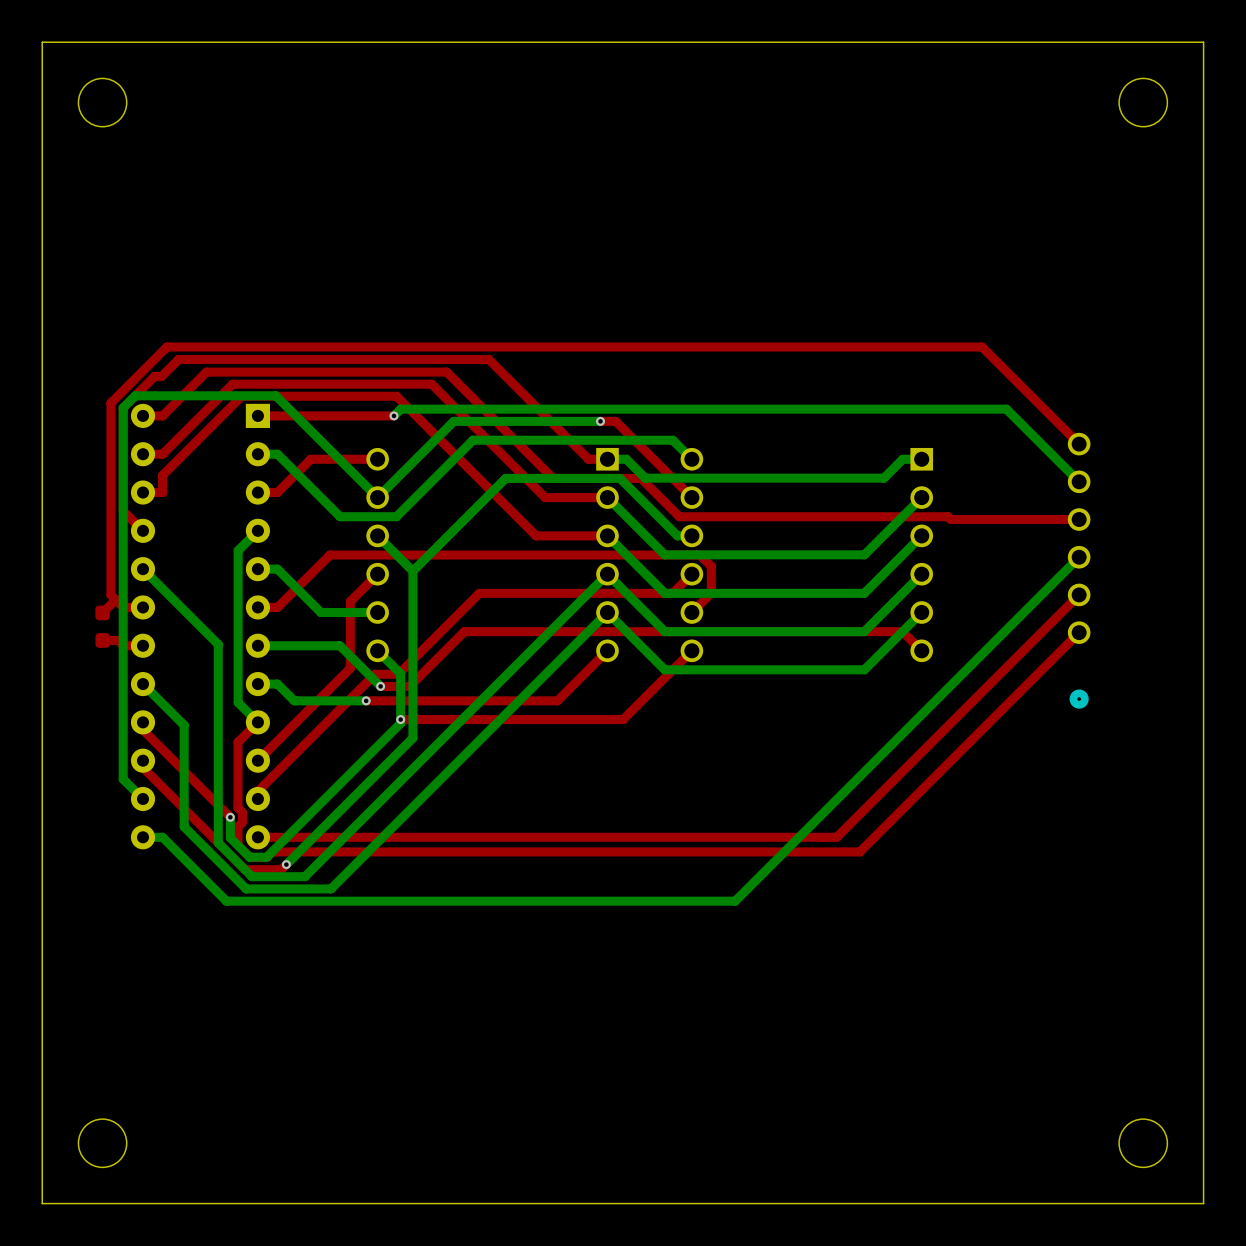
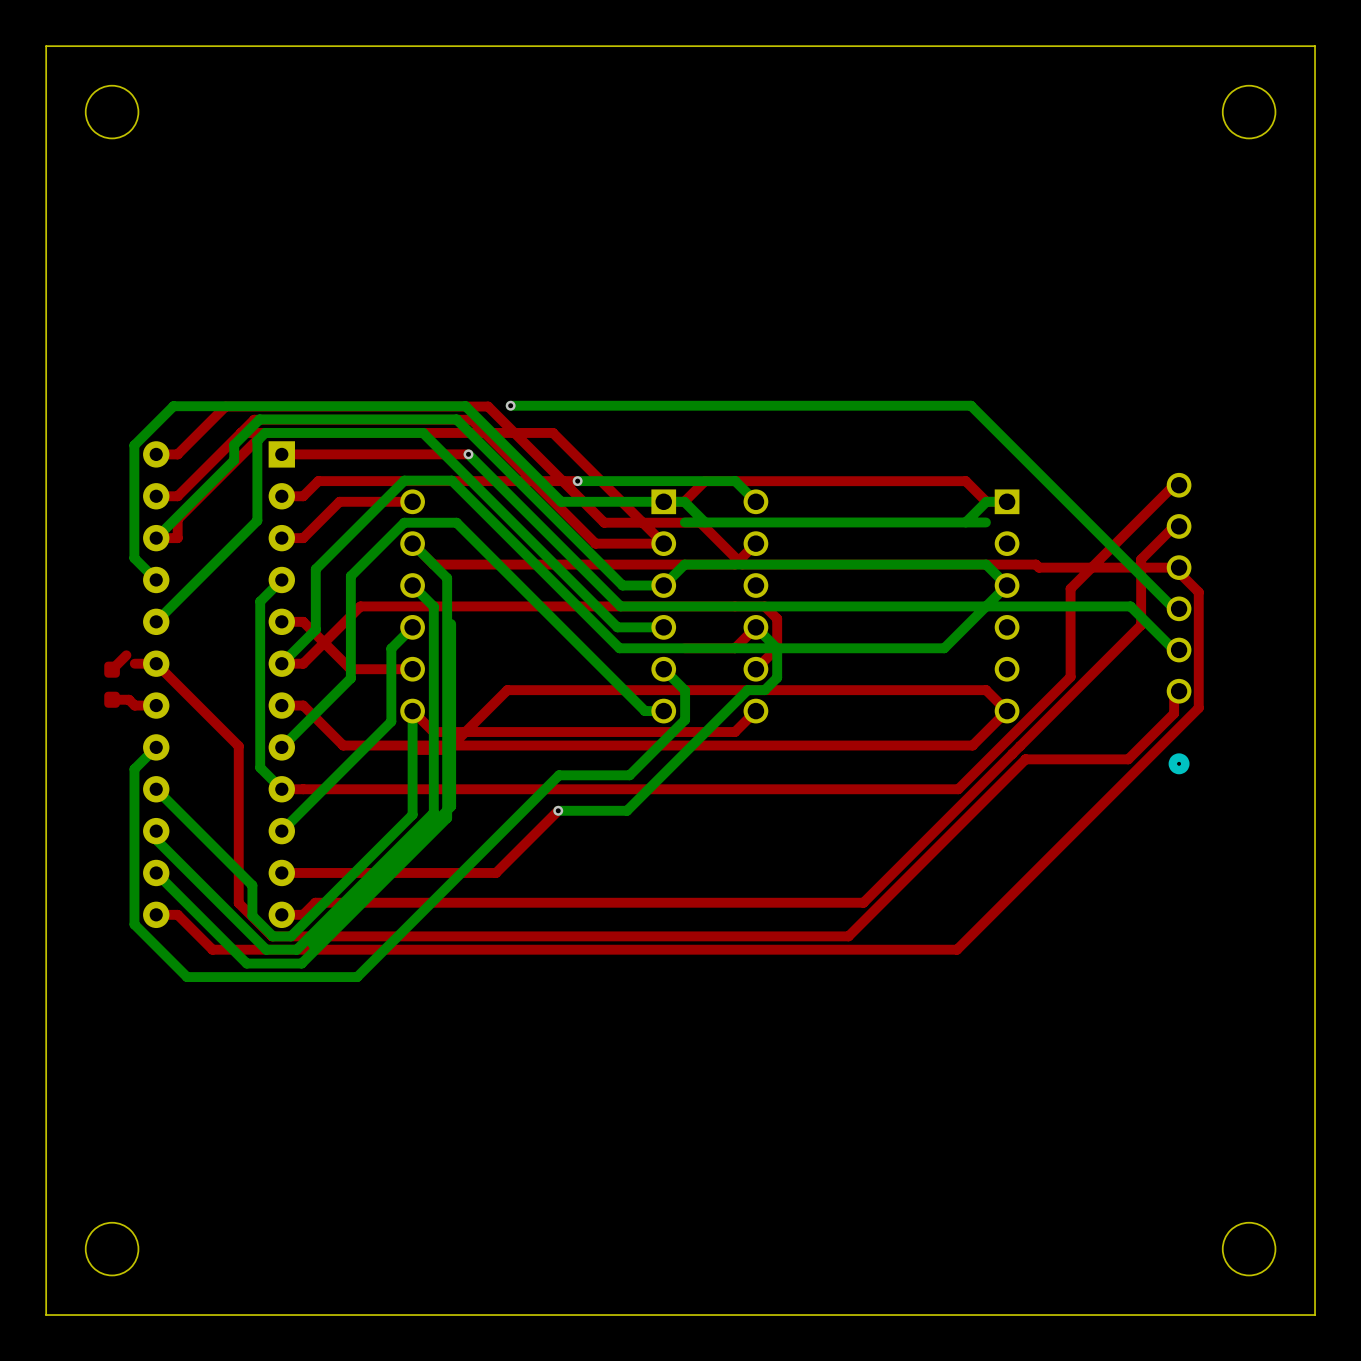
bottom track: none -> (510, 405) (971, 405) (1174, 608)
via: none -> (510, 405)
top track: (396, 396) (536, 535) (607, 535) -> (433, 432) (553, 432) (663, 543)
top track: (393, 415) (257, 415) -> (468, 454) (281, 454)
bottom track: (393, 415) (400, 409) (1006, 409) (1079, 481) -> none
via position: (393, 415) -> (468, 454)
bottom track: none -> (468, 454) (620, 606) (1130, 606) (1174, 650)
top track: (600, 421) (615, 421) (691, 497) -> (412, 543) (433, 564) (735, 564) (755, 543)
bottom track: (600, 421) (453, 421) (377, 497) (275, 395) (135, 395) (123, 407) (123, 779) (142, 798) -> (412, 543) (447, 578) (447, 818) (301, 963) (246, 963) (156, 872)
via: (600, 421) -> none
top track: none -> (577, 481) (318, 481) (303, 496) (281, 496)
bottom track: (528, 440) (473, 440) (396, 516) (340, 516) (277, 454) (257, 454) -> none
via: none -> (577, 481)
top track: (1079, 444) (982, 347) (166, 347) (110, 403) (110, 595) (123, 607) -> none
top track: (607, 459) (588, 459) (488, 359) (178, 359) (161, 376) (154, 376) (123, 407) (123, 511) (142, 530) -> (663, 501) (684, 501) (704, 481) (965, 481) (986, 501) (1007, 501)
bottom track: none -> (663, 501) (561, 501) (465, 406) (173, 406) (134, 445) (134, 558) (156, 579)
bottom track: none -> (156, 538) (234, 460) (234, 444) (259, 419) (456, 419) (622, 585) (663, 585) (684, 564) (986, 564) (1007, 585)
bottom track: (921, 497) (864, 554) (664, 554) (607, 497) -> none
top track: none -> (1174, 567) (1198, 592) (1198, 708) (957, 949) (212, 949) (177, 914) (156, 914)
bottom track: (607, 535) (664, 593) -> (281, 663) (315, 629) (315, 569) (404, 480) (451, 480) (619, 648) (726, 648)
bottom track: (691, 535) (677, 535) (620, 478) (505, 478) (412, 571) (397, 555) -> (156, 831) (156, 839) (266, 949) (296, 949) (433, 812) (433, 606)
bottom track: (1079, 557) (735, 901) (226, 901) (162, 837) (142, 837) -> none
bottom track: (142, 569) (218, 644) (218, 842) (252, 876) (304, 876) (607, 574) (664, 631) (684, 631) -> (156, 621) (257, 520) (257, 440) (265, 432) (423, 432) (617, 627) (663, 627)
top track: none -> (281, 621) (303, 621) (350, 669) (412, 669)
bottom track: (257, 569) (277, 569) (320, 612) (377, 612) -> none
top track: (377, 574) (350, 601) (350, 668) (257, 760) -> none
bottom track: none -> (412, 627) (391, 648) (391, 721) (281, 831)
bottom track: (921, 574) (864, 631) (700, 631) -> (755, 627) (777, 648) (777, 677) (764, 690)
top track: (626, 593) (479, 593) (398, 674) (374, 674) (257, 791) (257, 798) -> (558, 810) (496, 872) (281, 872)
top track: (1079, 594) (836, 837) (277, 837) -> (1174, 526) (1141, 559) (1141, 625) (863, 902) (315, 902) (303, 914)
top track: none -> (156, 663) (238, 746) (238, 903) (271, 936) (848, 936) (1025, 759) (1128, 759) (1174, 713) (1174, 691)
bottom track: (607, 612) (331, 888) (246, 888) (184, 826) (184, 725) (142, 684) -> (685, 690) (685, 719) (629, 775) (559, 775) (357, 977) (187, 977) (134, 924) (134, 769) (156, 747)
bottom track: (921, 612) (864, 669) (664, 669) (627, 632) -> none
bottom track: none -> (747, 690) (627, 810) (558, 810)
top track: (1079, 632) (859, 851) (272, 851) (266, 857) (250, 857) (238, 845) (238, 826) (242, 822) (242, 812) (238, 807) (238, 742) (257, 722) -> (1174, 485) (1070, 588) (1070, 676) (958, 789) (281, 789)
top track: none -> (281, 705) (303, 705) (343, 745) (972, 745) (1007, 711)
bottom track: (257, 645) (339, 645) (380, 686) -> none
bottom track: (377, 650) (400, 673) (400, 723) (266, 857) (249, 857) (230, 837) (230, 817) -> (412, 711) (412, 814) (290, 936) (272, 936) (252, 915) (252, 885) (156, 789)
top track: (607, 650) (557, 700) (366, 700) -> none
top track: (672, 669) (623, 719) (400, 719) -> (735, 732) (433, 732) (412, 711)
bottom track: (257, 684) (277, 684) (294, 700) (366, 700) -> (281, 747) (350, 678) (350, 576) (404, 522) (456, 522) (644, 711) (663, 711)
via: (380, 686) -> none
via: (366, 700) -> none
via: (400, 719) -> none
top track: (142, 722) (142, 729) (230, 817) -> none
via: none -> (558, 810)
top track: (142, 760) (142, 767) (245, 869) (281, 869) (286, 864) -> none
via: (230, 817) -> none
via: (286, 864) -> none

